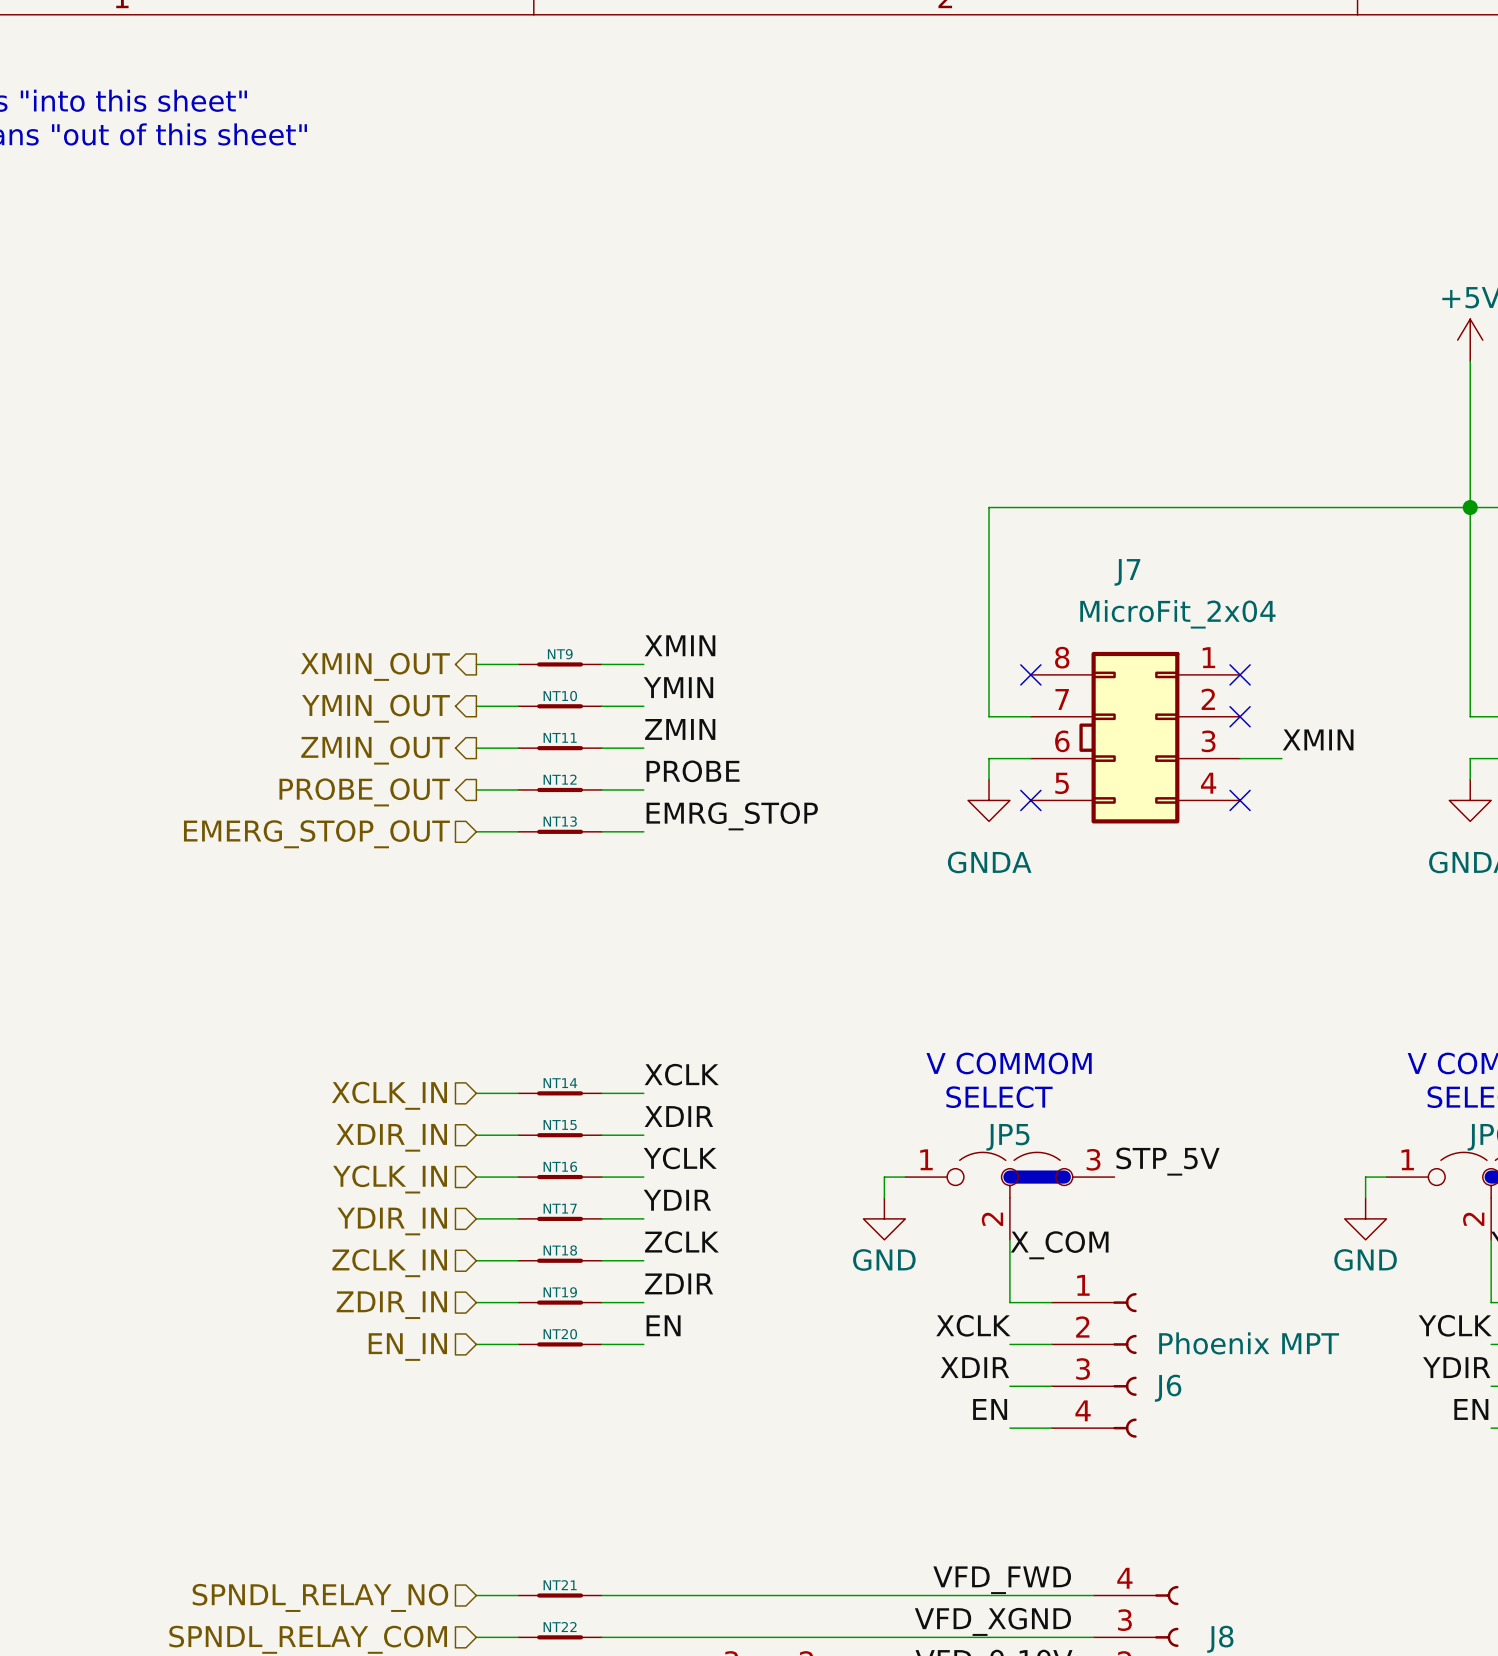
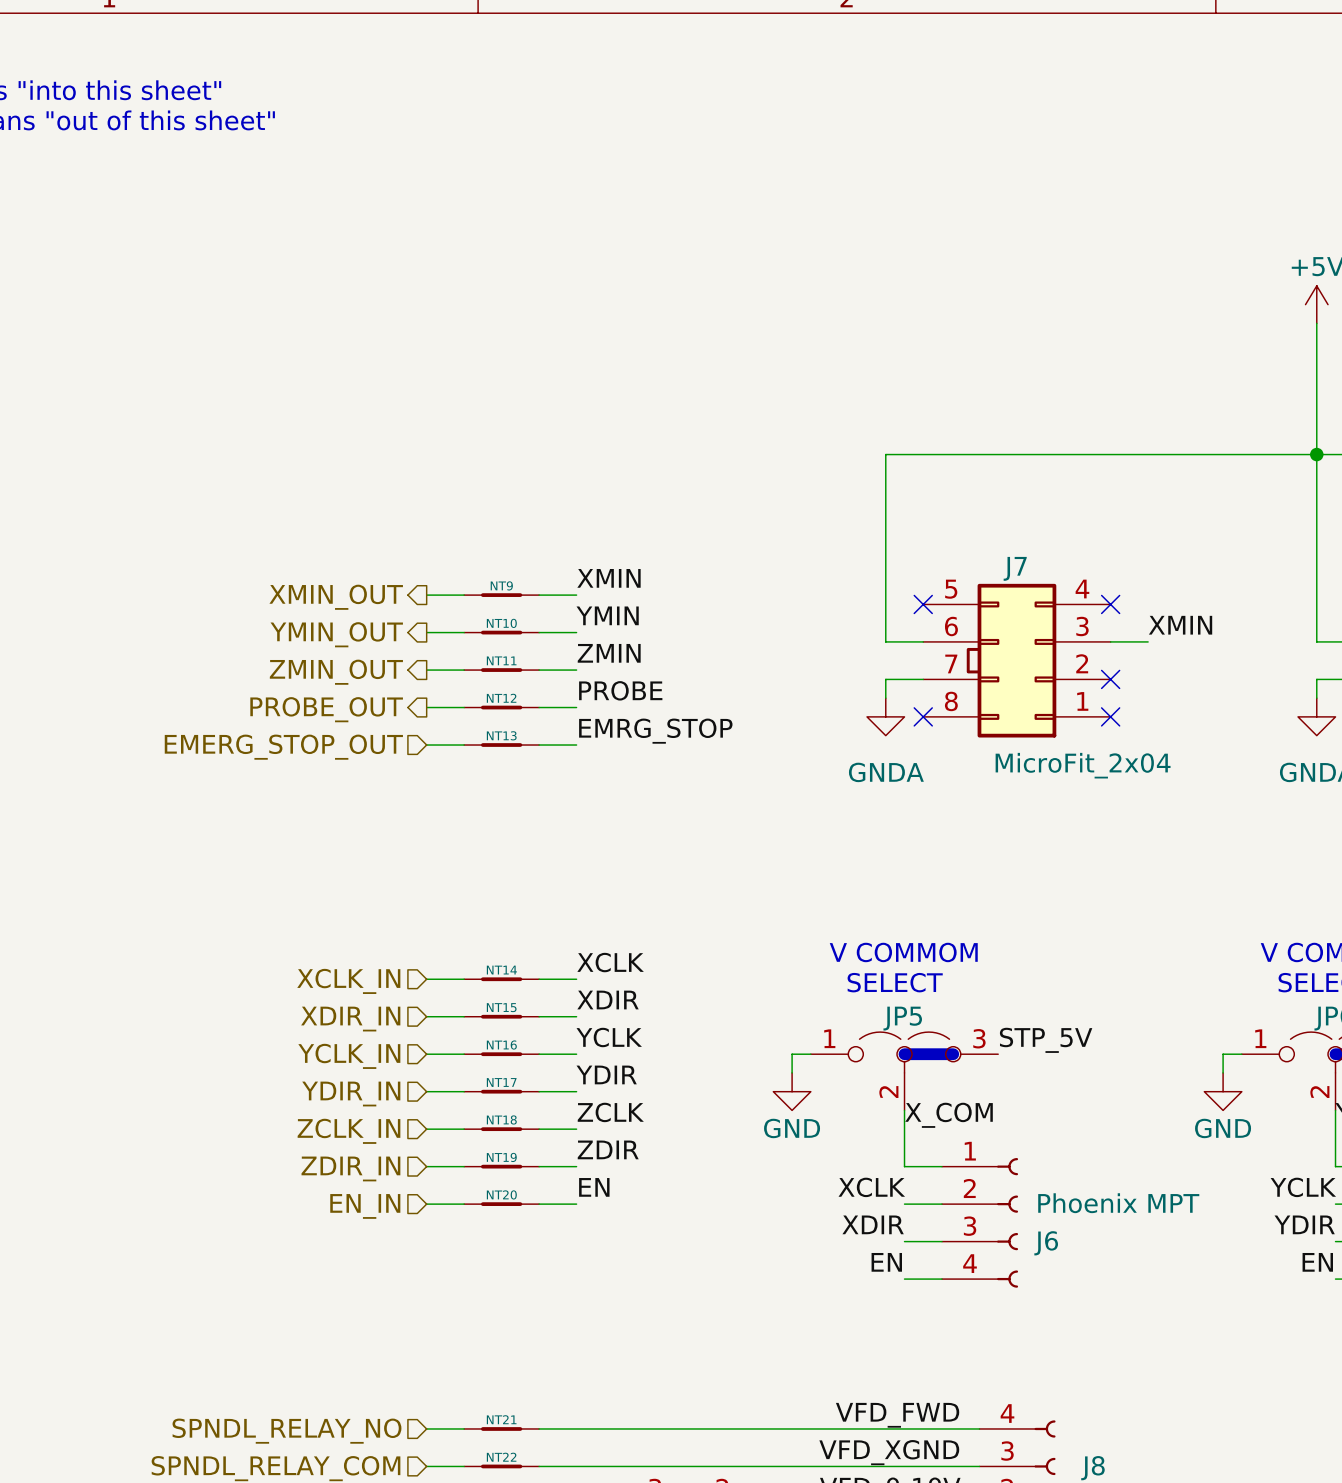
J7 name position: J7 (1127, 572) -> J7 (1015, 568)
no-connect mark position: (1240, 716) -> (1110, 679)
J7 flip: as is (1129, 737) -> up-down (1011, 660)
label position: XMIN (1318, 739) -> XMIN (1180, 625)
wire: (1240, 758) (1281, 758) -> (1110, 641) (1148, 641)

